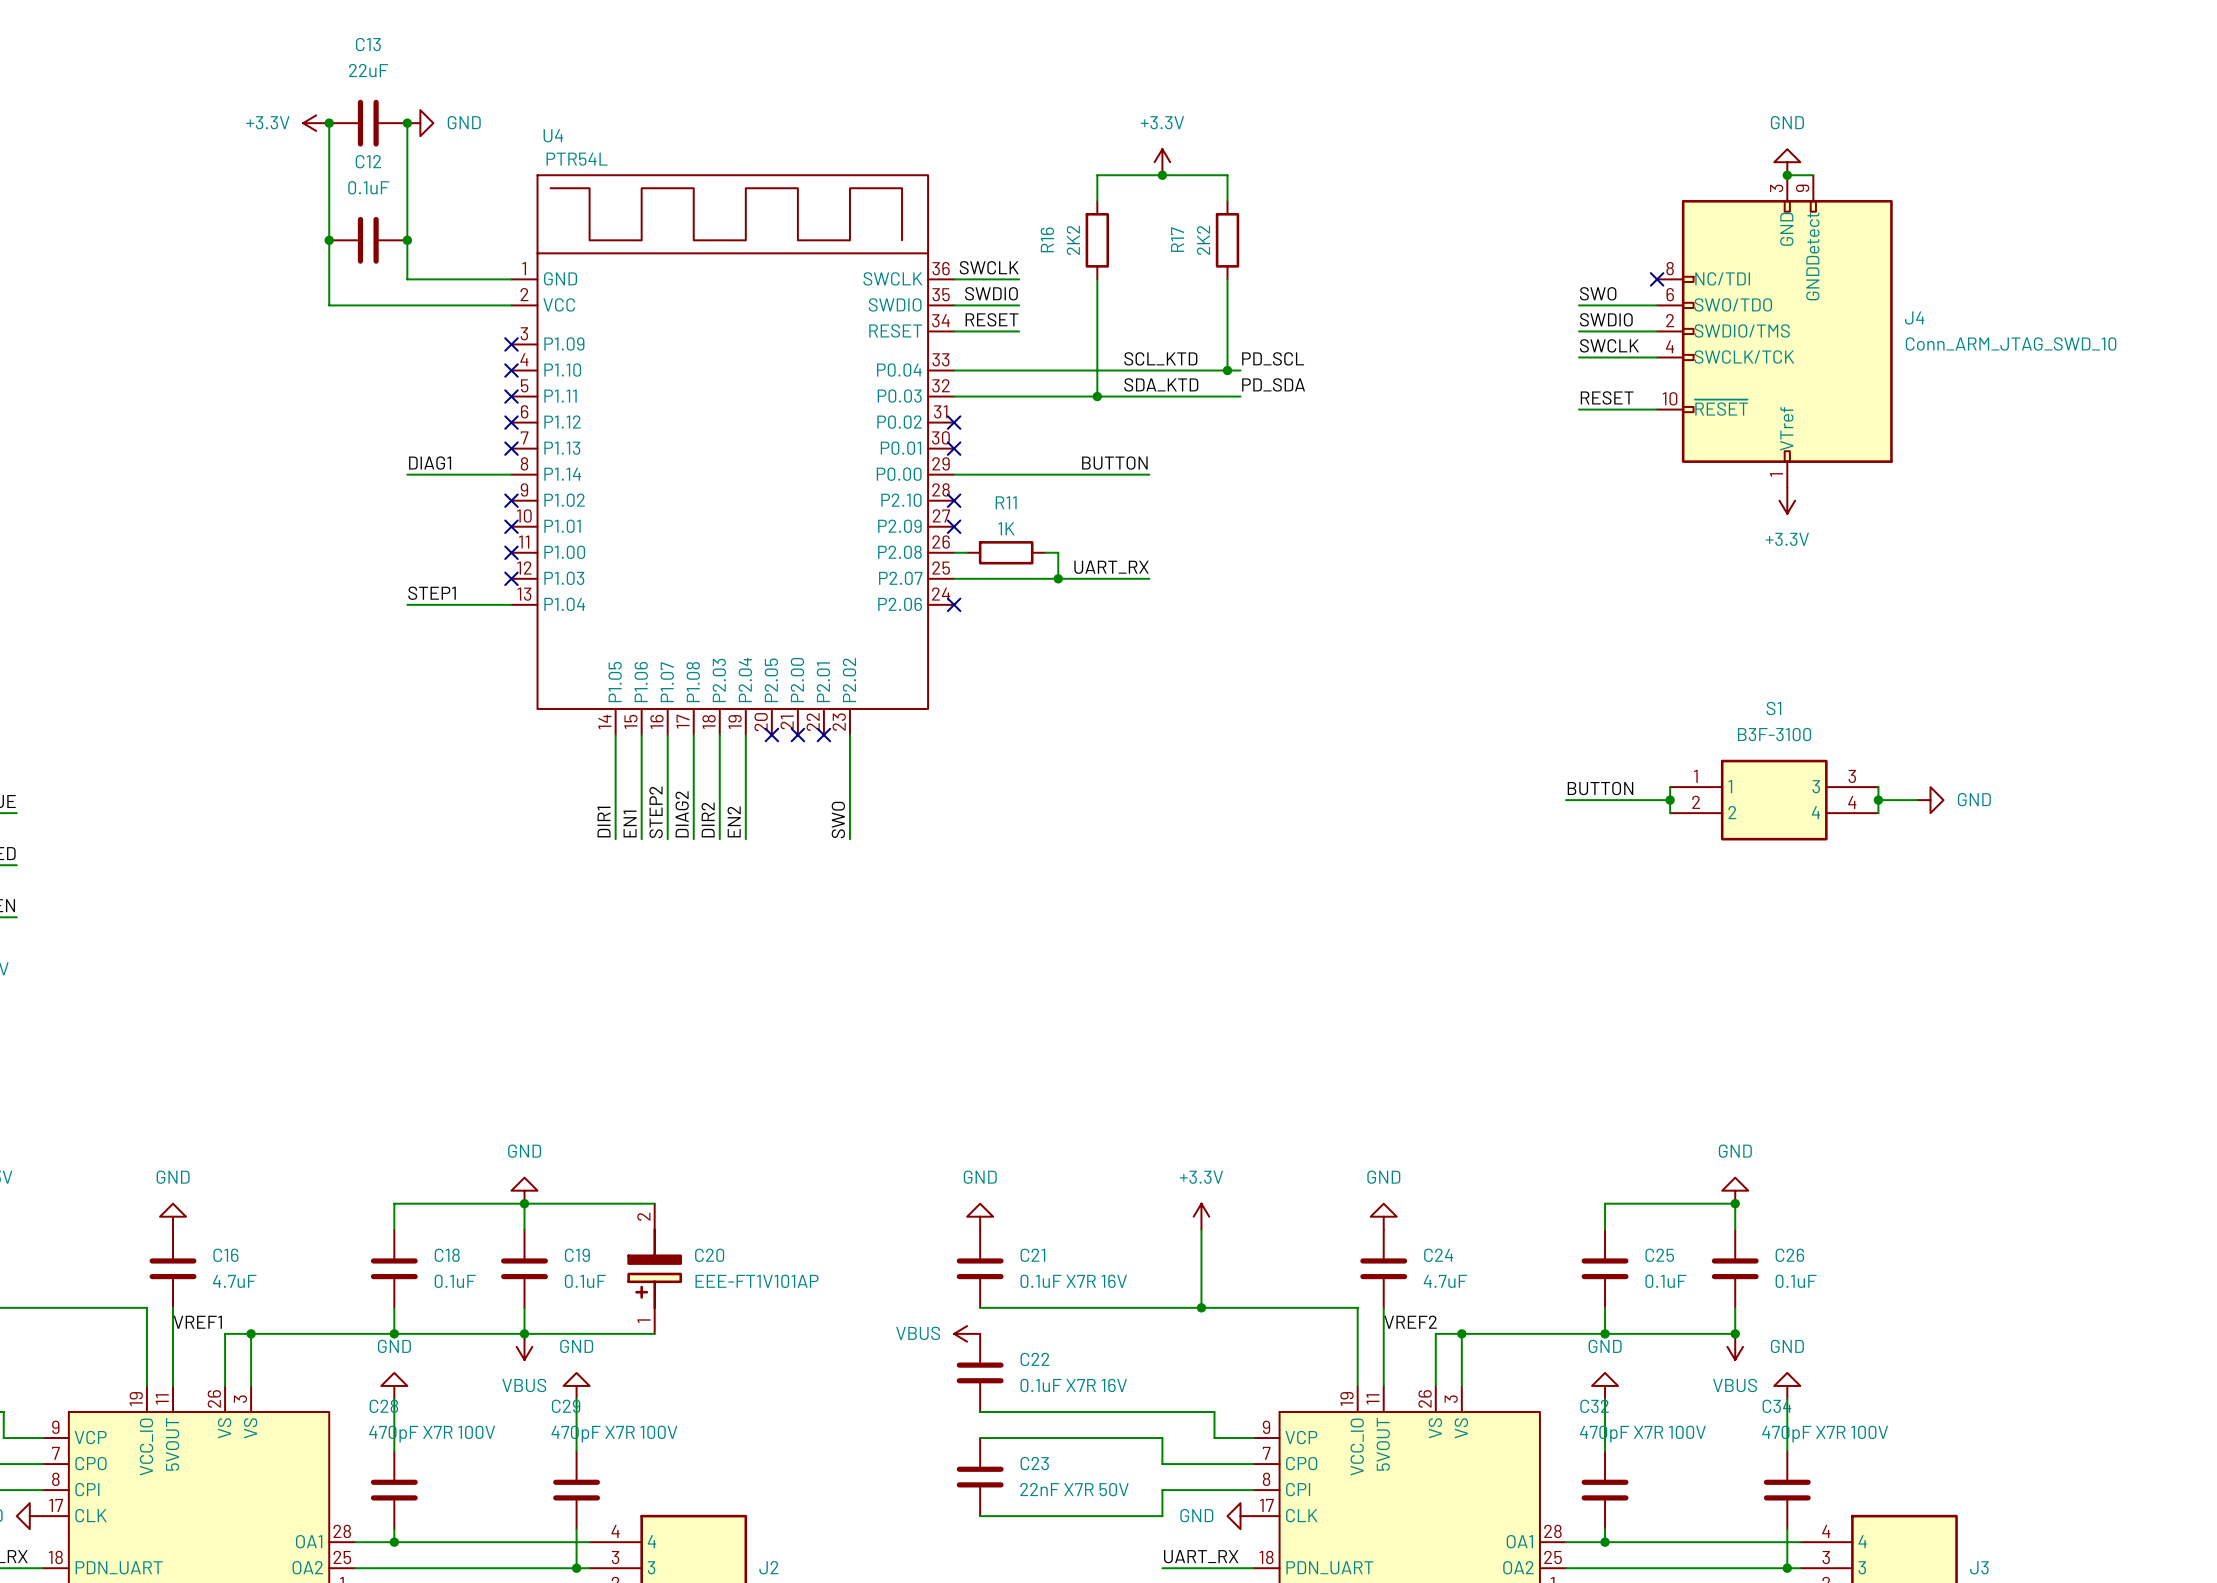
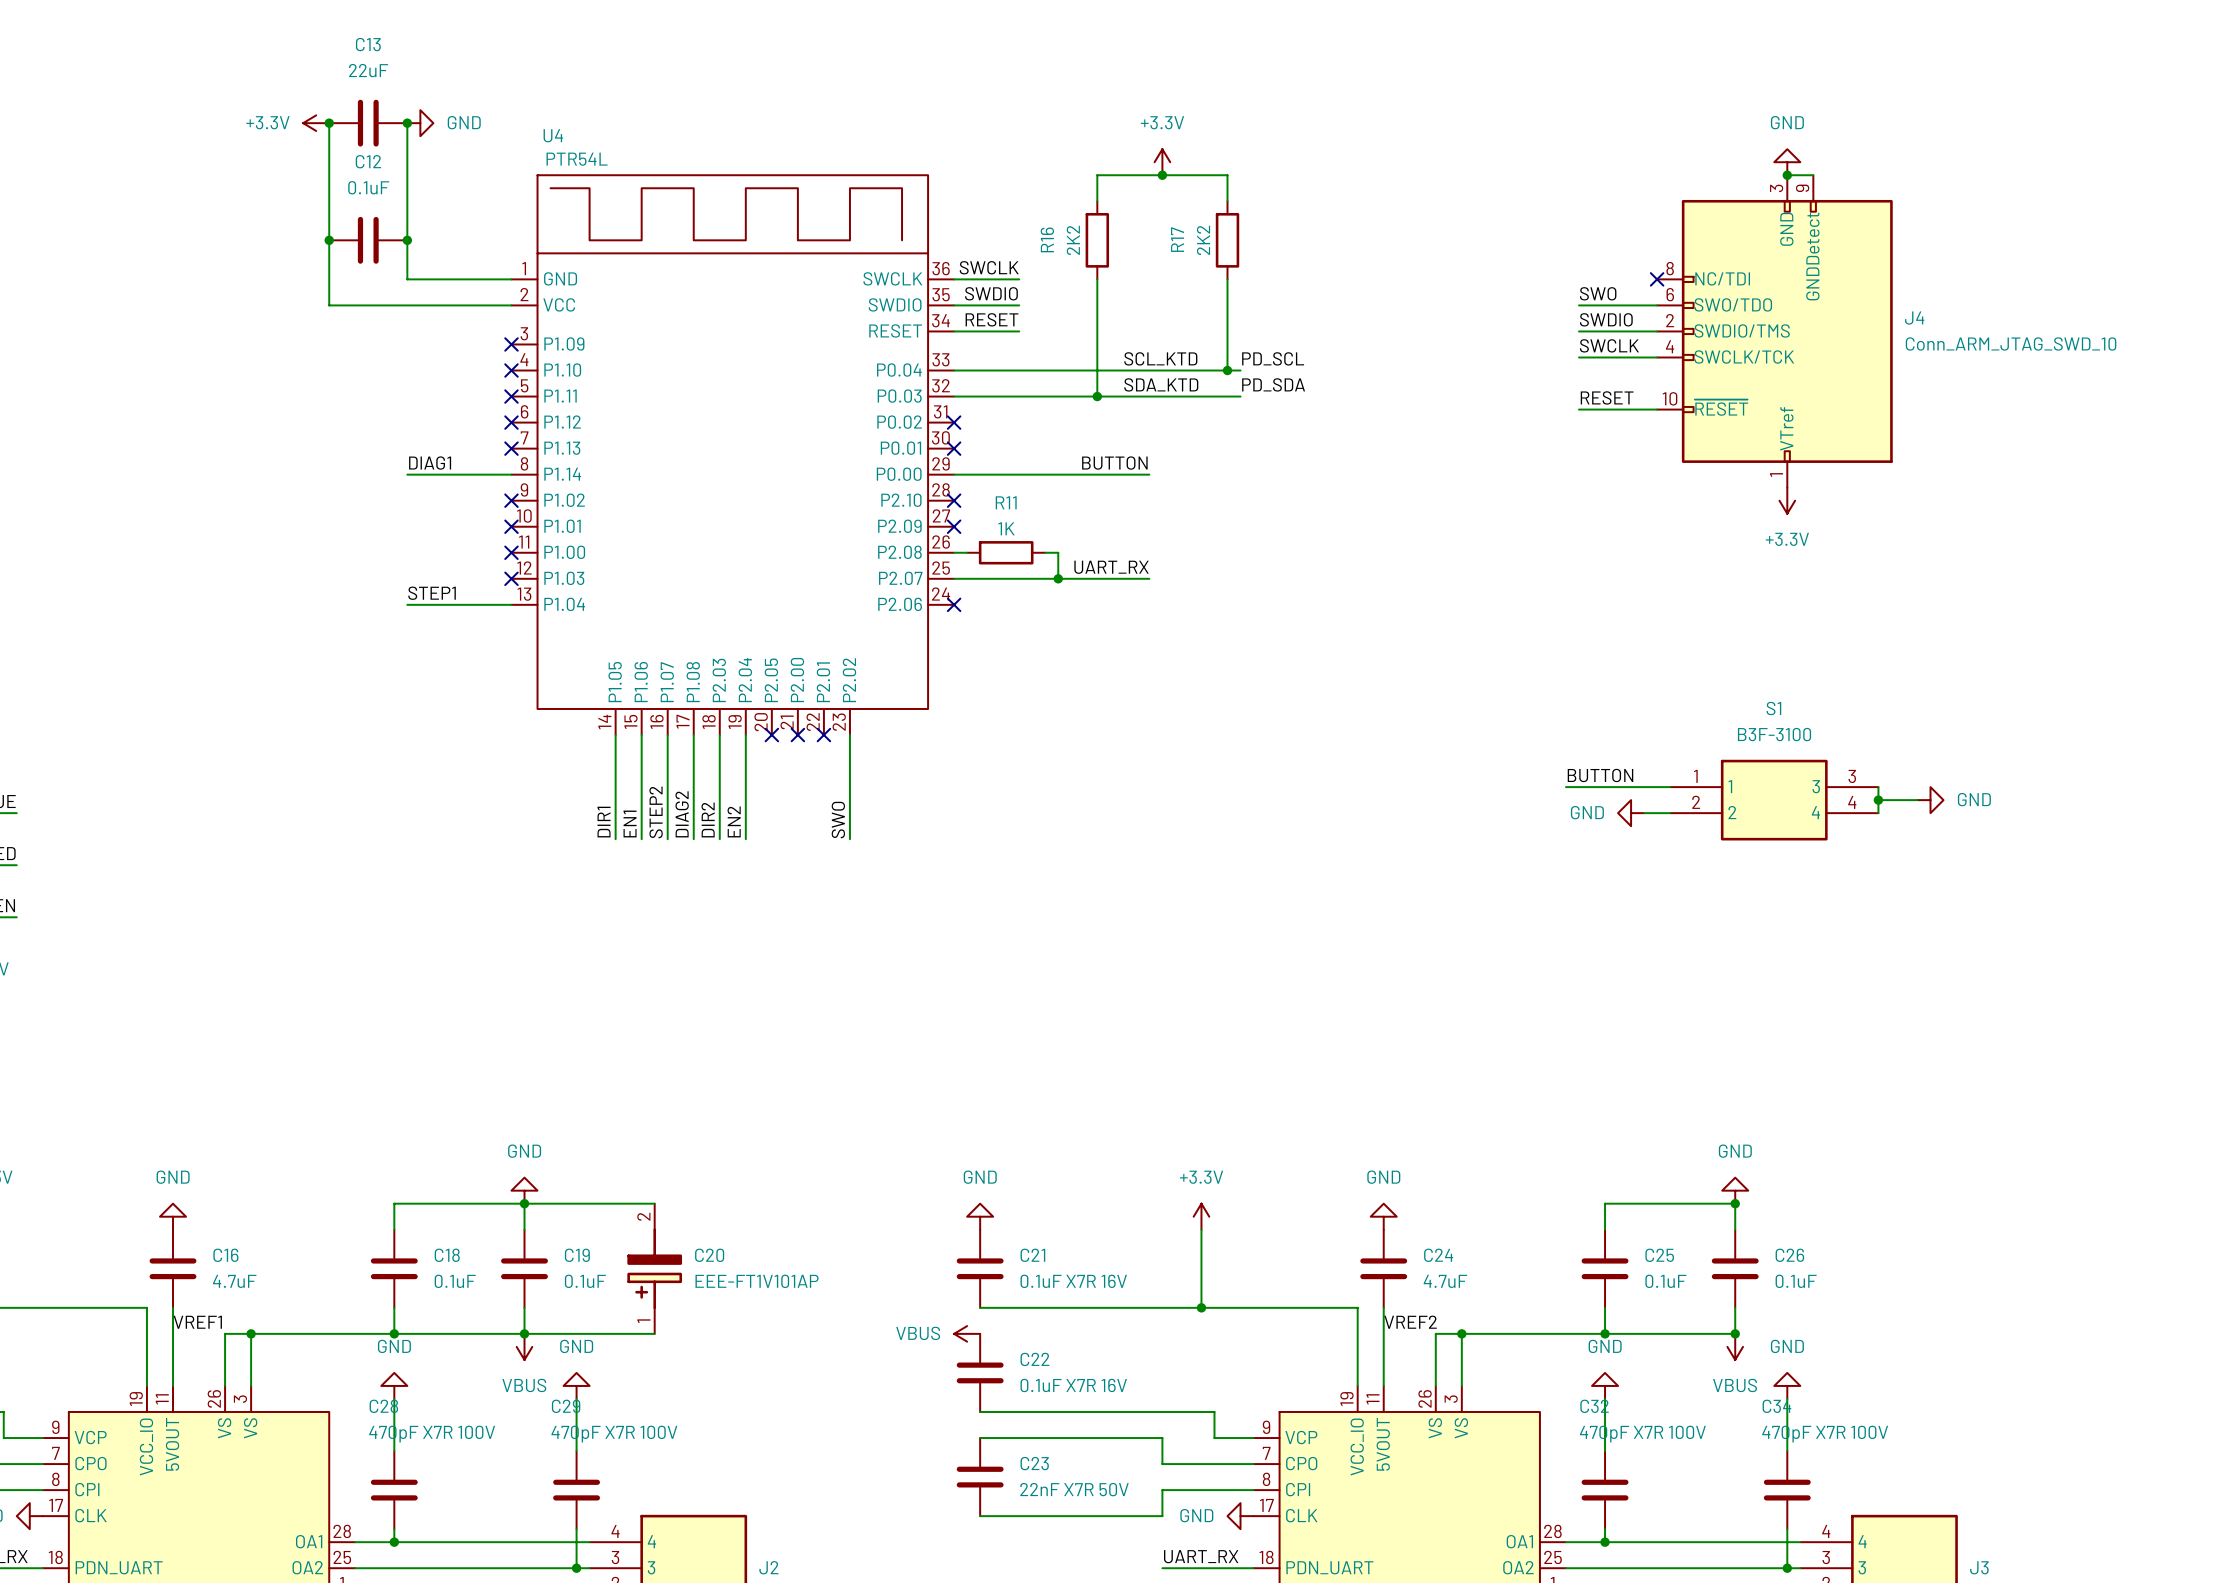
wire: (1670, 787) (1670, 813) -> (1644, 813) (1670, 813)
label position: BUTTON (1600, 788) -> BUTTON (1600, 775)
wire: (1565, 800) (1670, 800) -> (1565, 787) (1670, 787)
junction: (1670, 800) -> none
power symbol: none -> GND (1631, 813)

